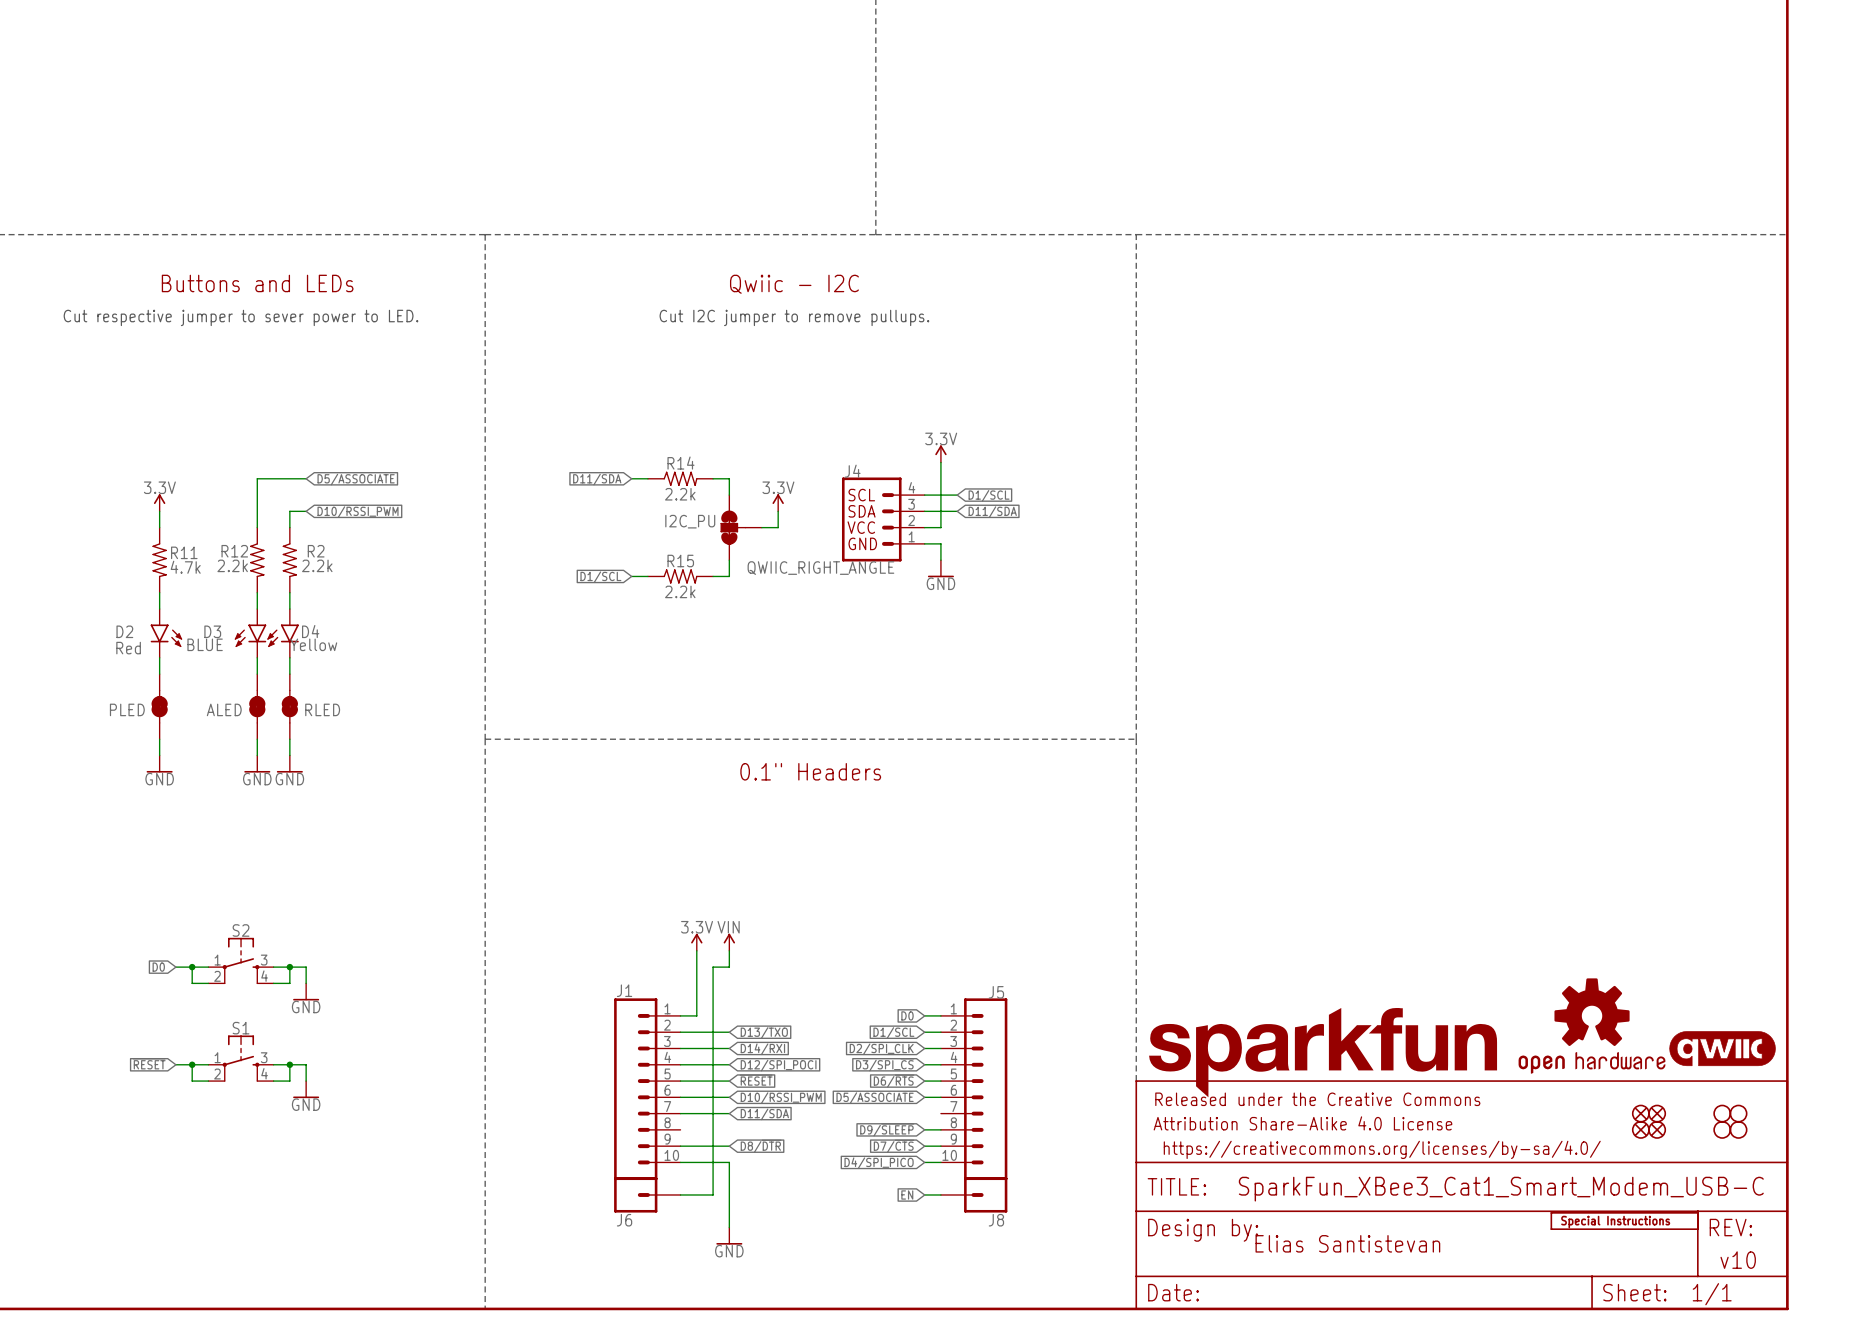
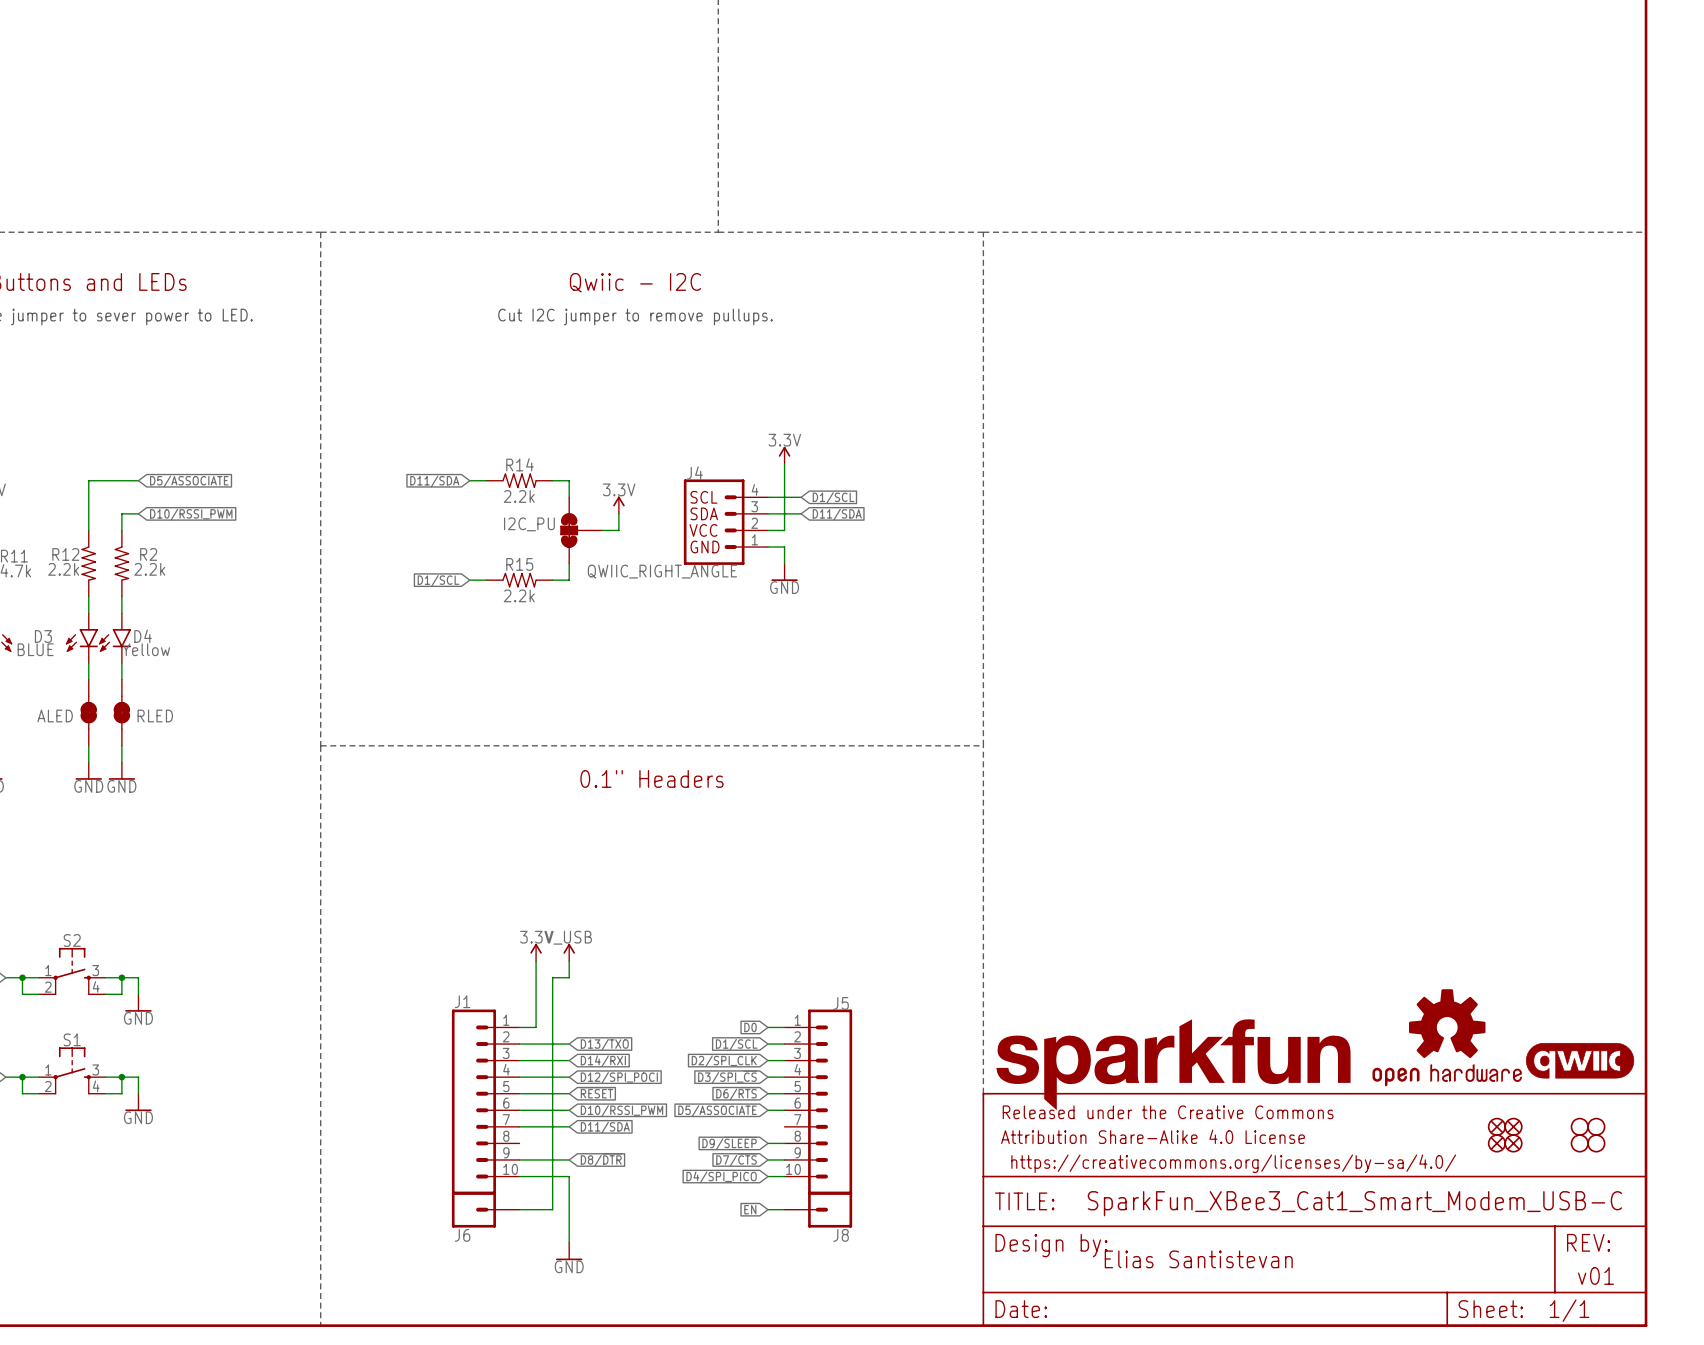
power symbol: VIN (729, 942) -> V_USB (569, 952)
part: (1624, 1221) -> none
text: v10 (1738, 1260) -> v01 (1595, 1275)

